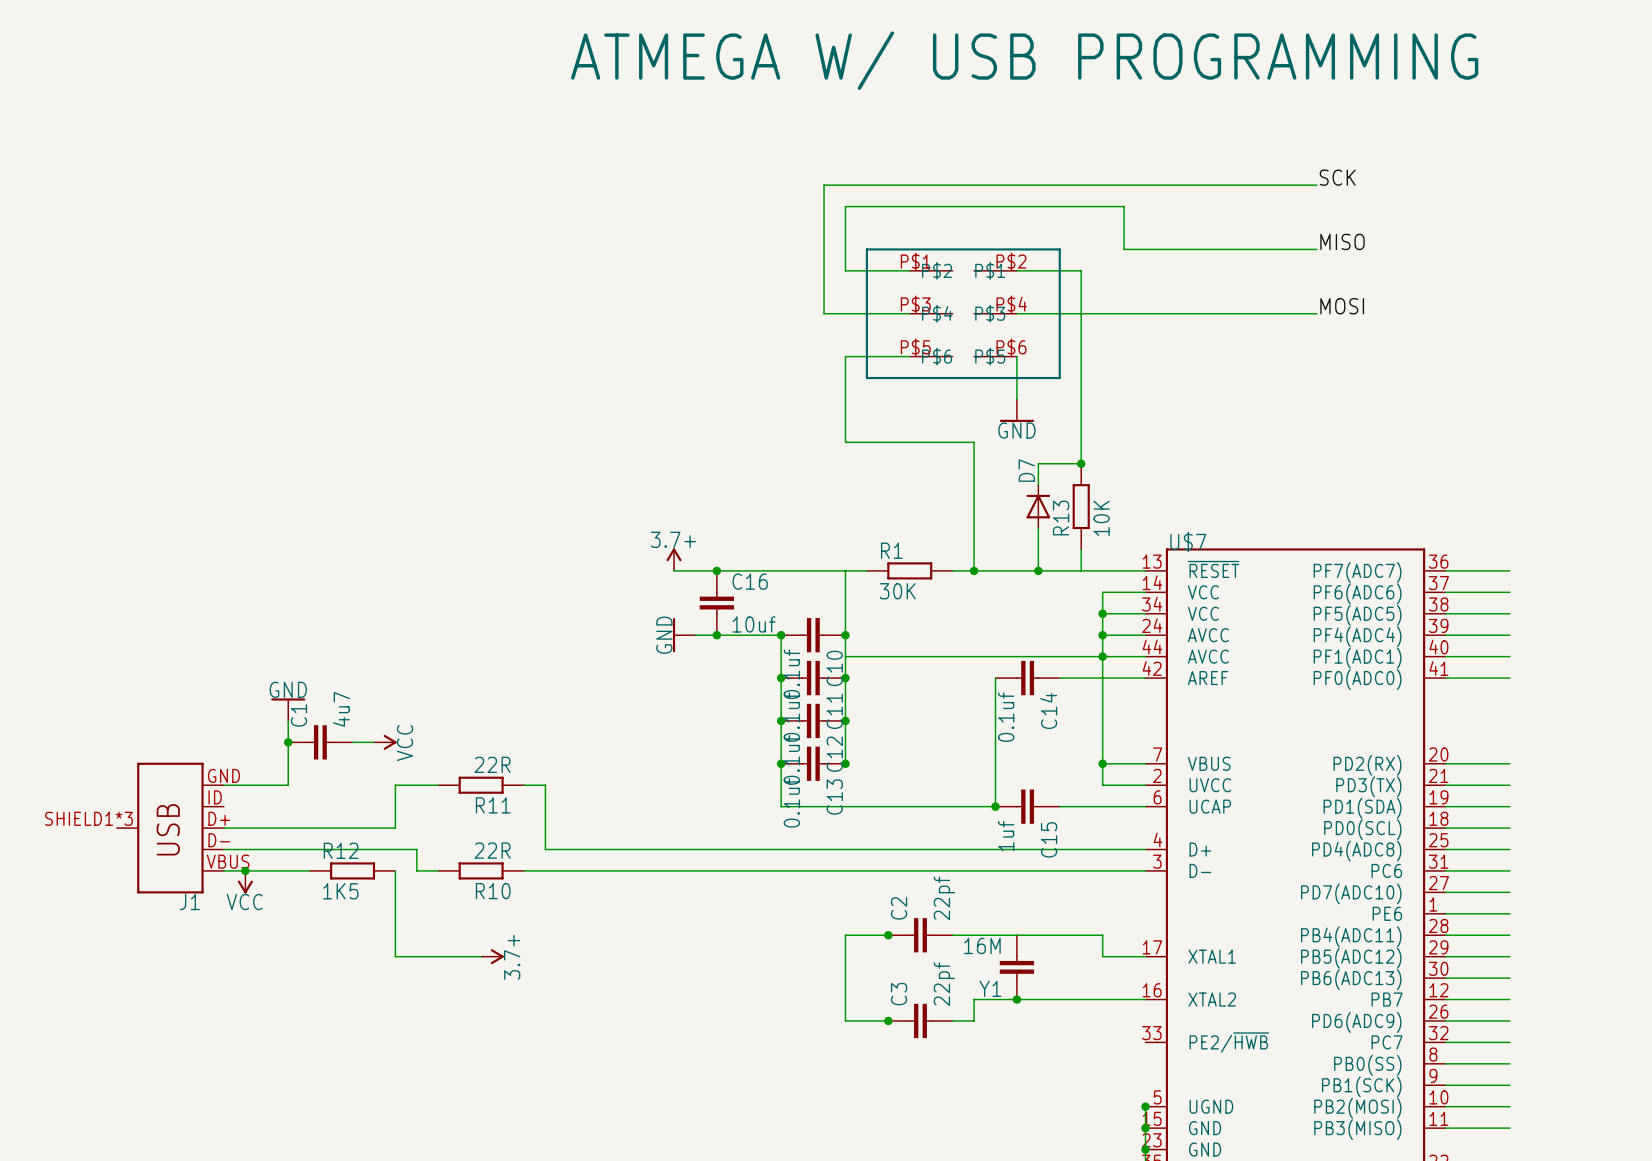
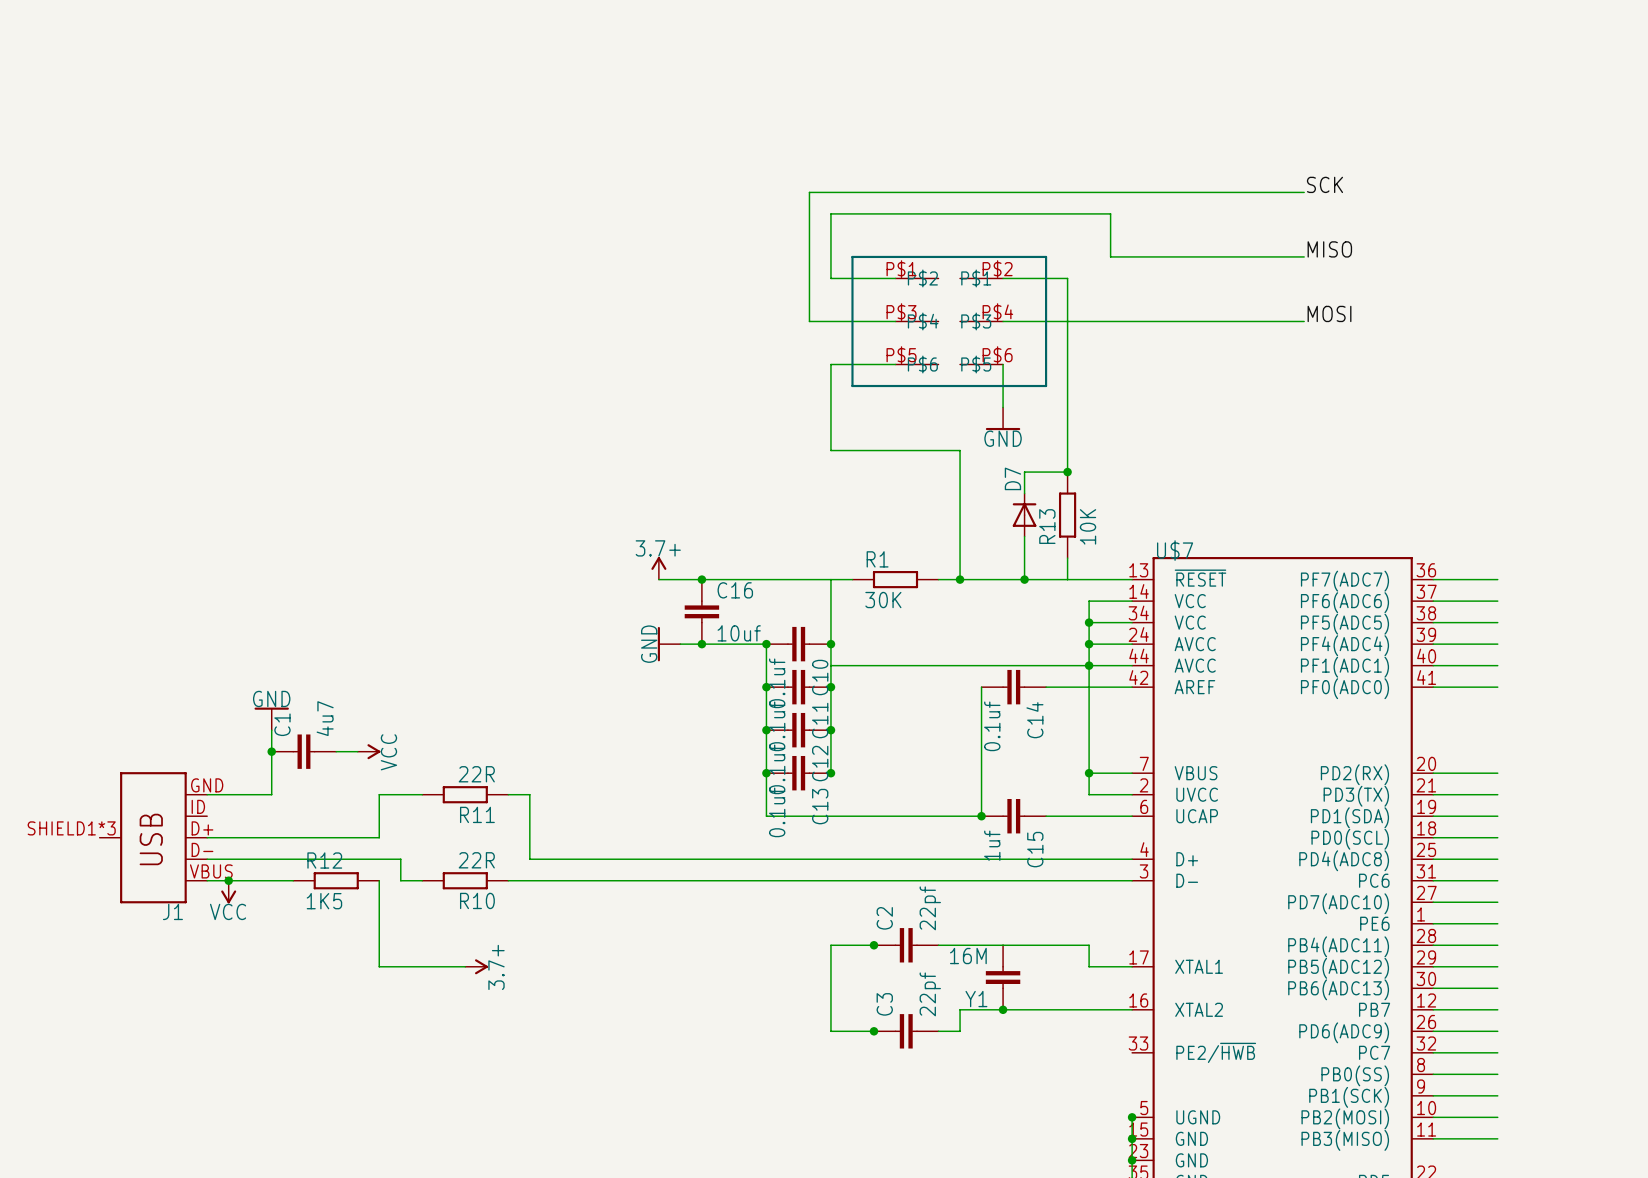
text: ATMEGA W/ USB PROGRAMMING (1024, 60) -> none

